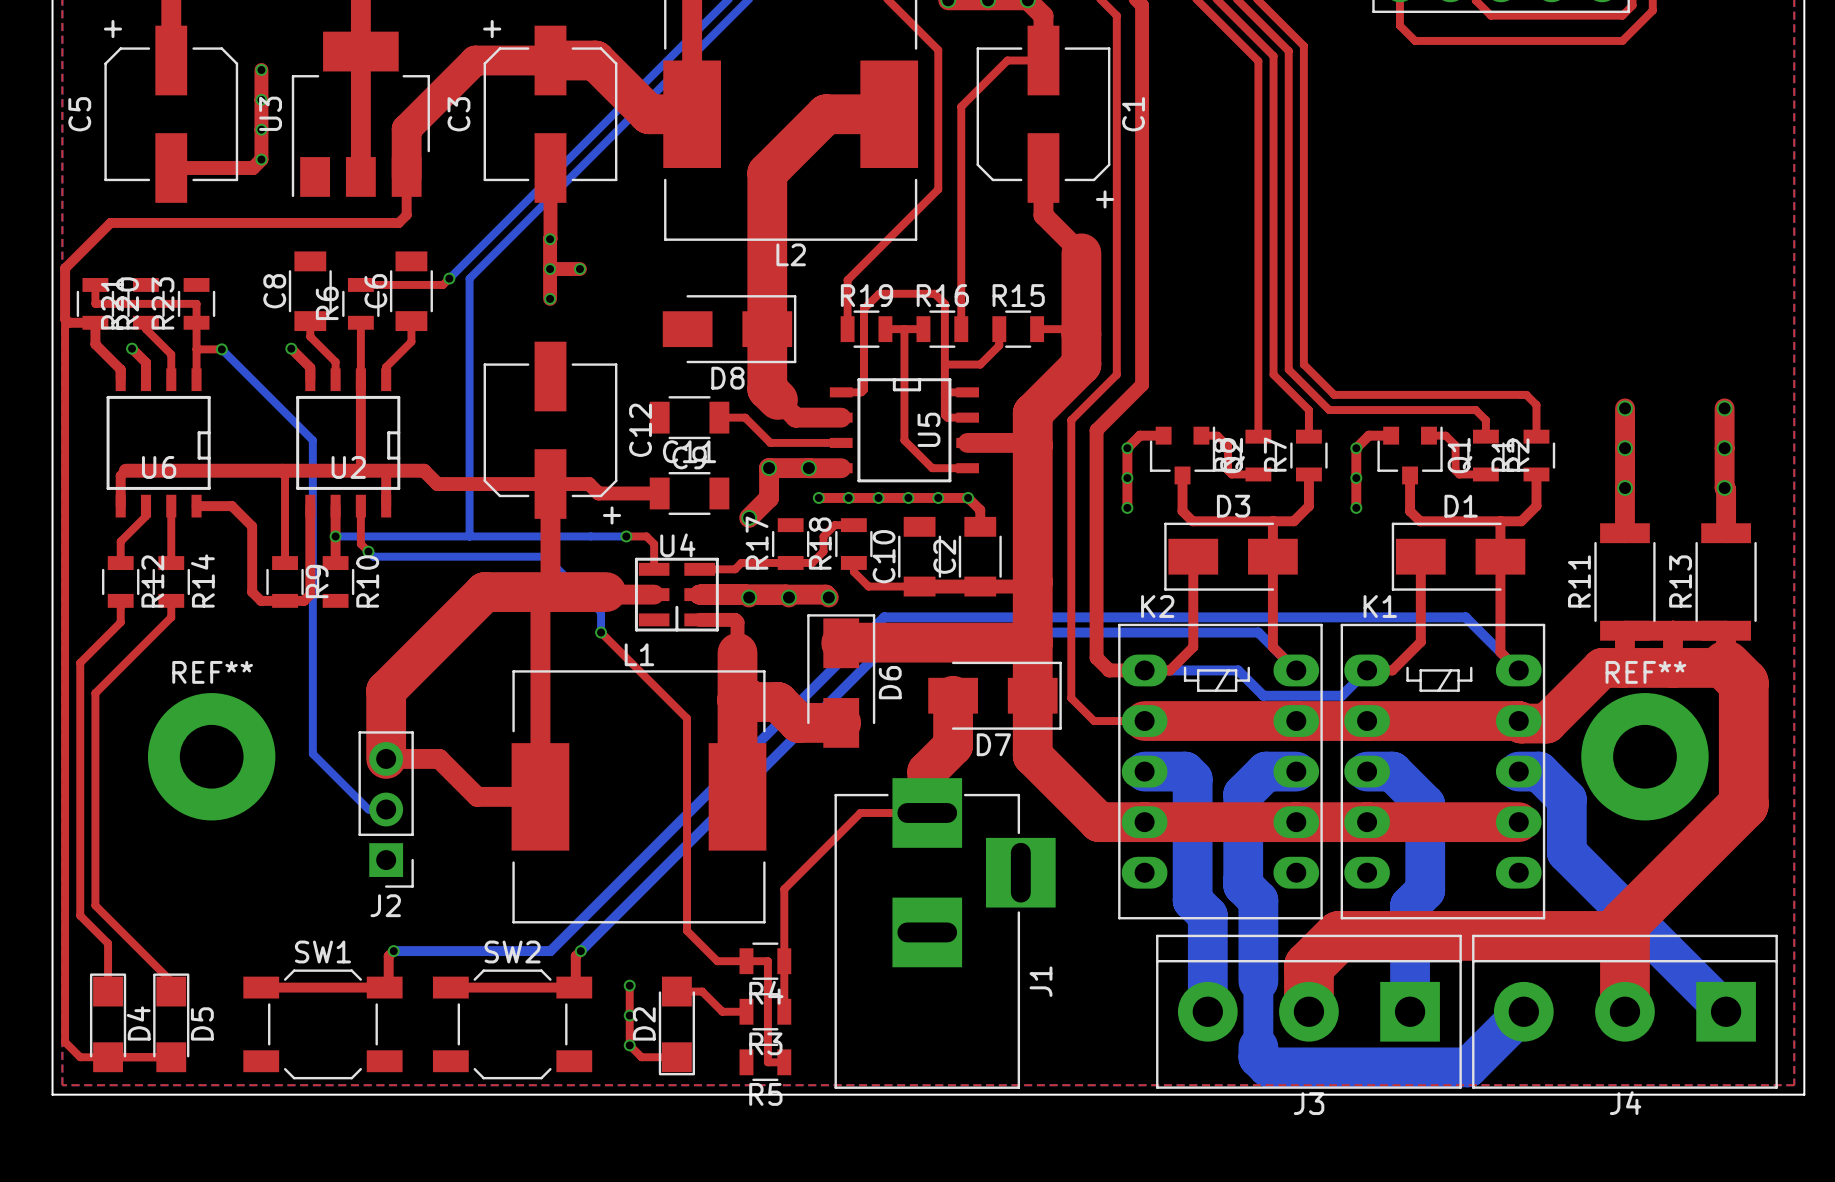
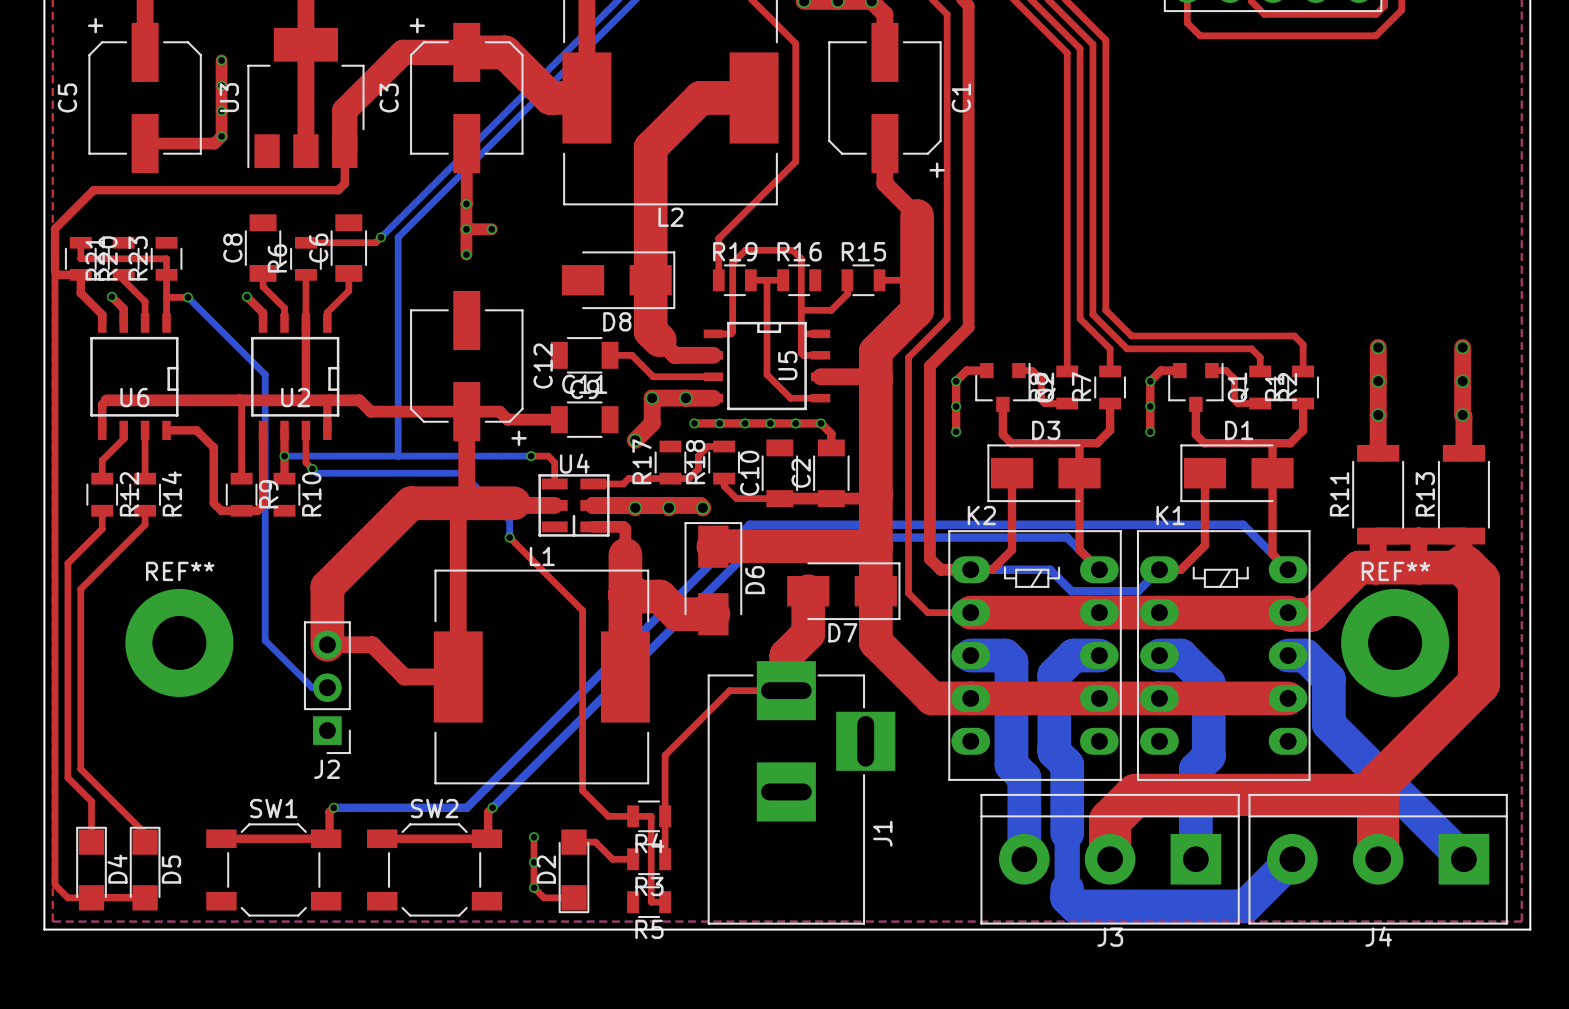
top track: (1043, 60) (1007, 60) (961, 106) (961, 329) -> none

